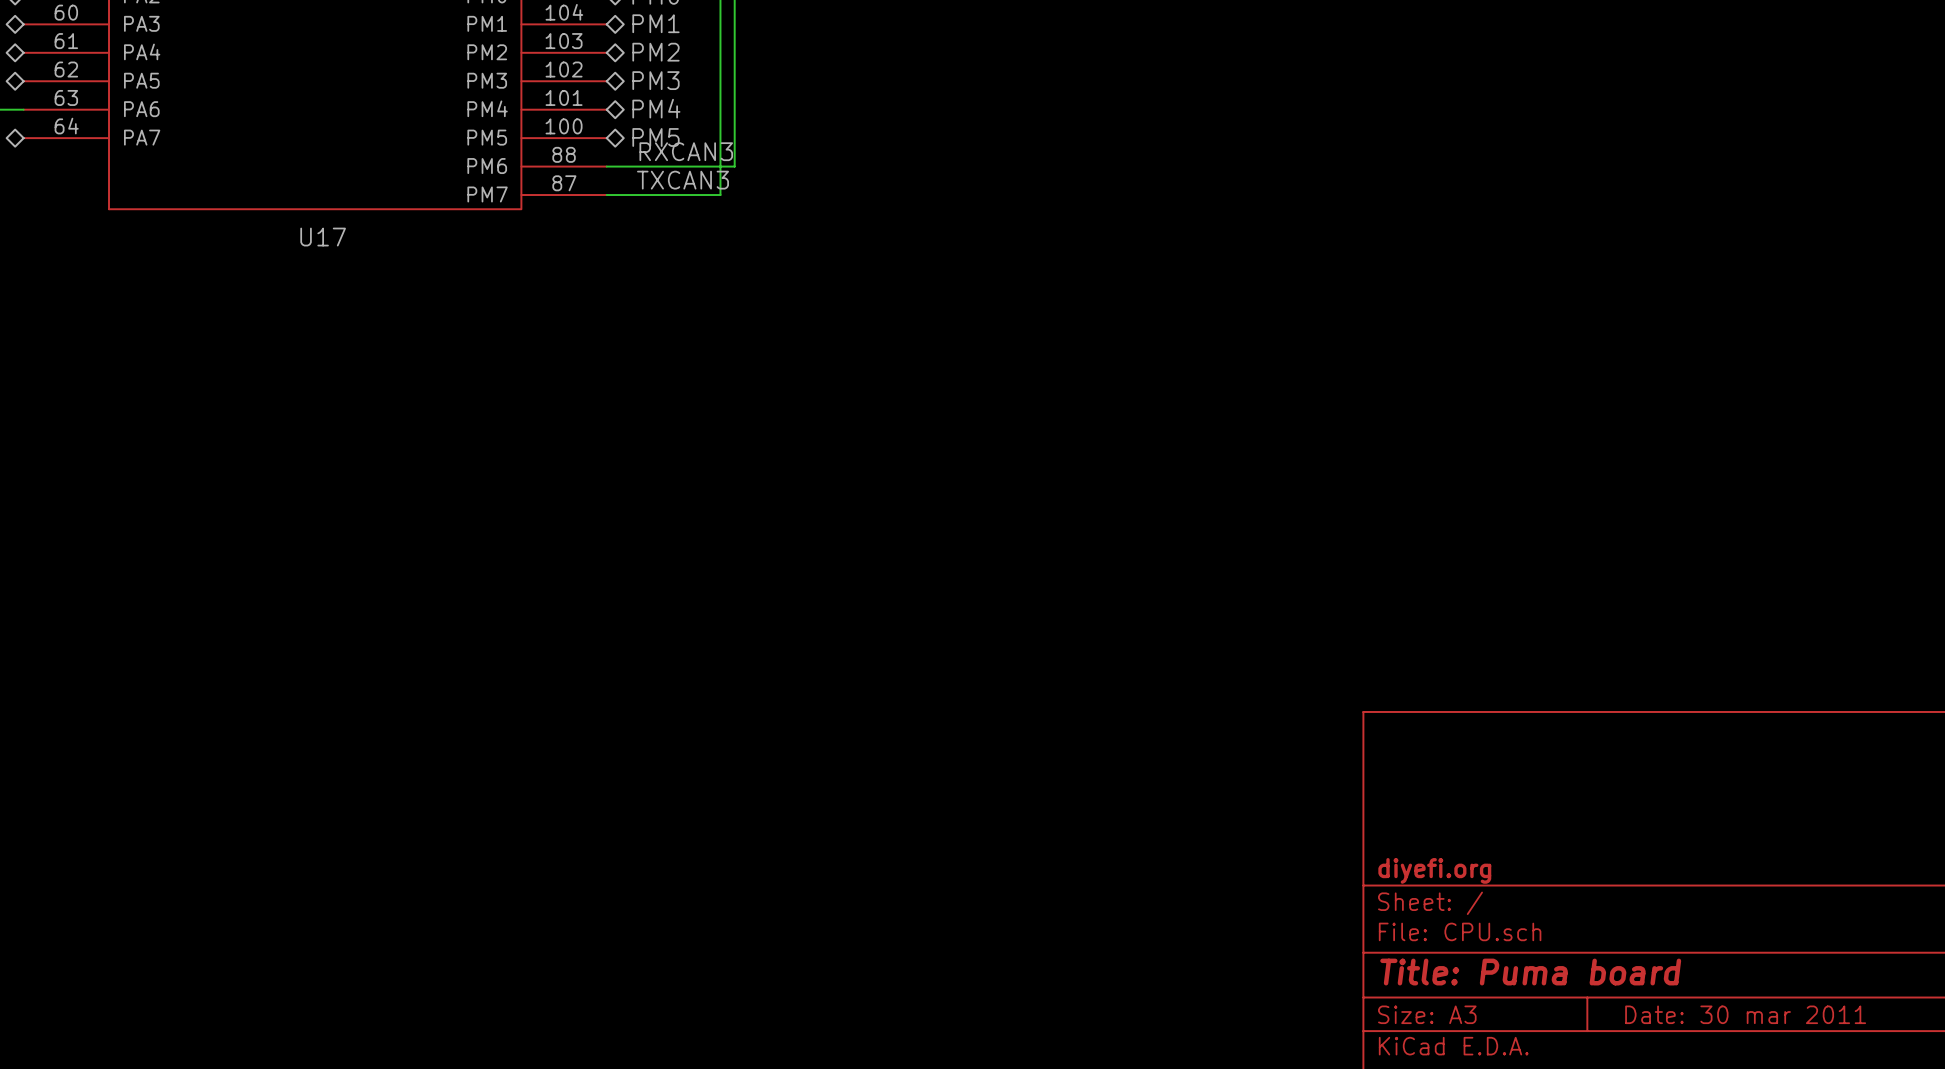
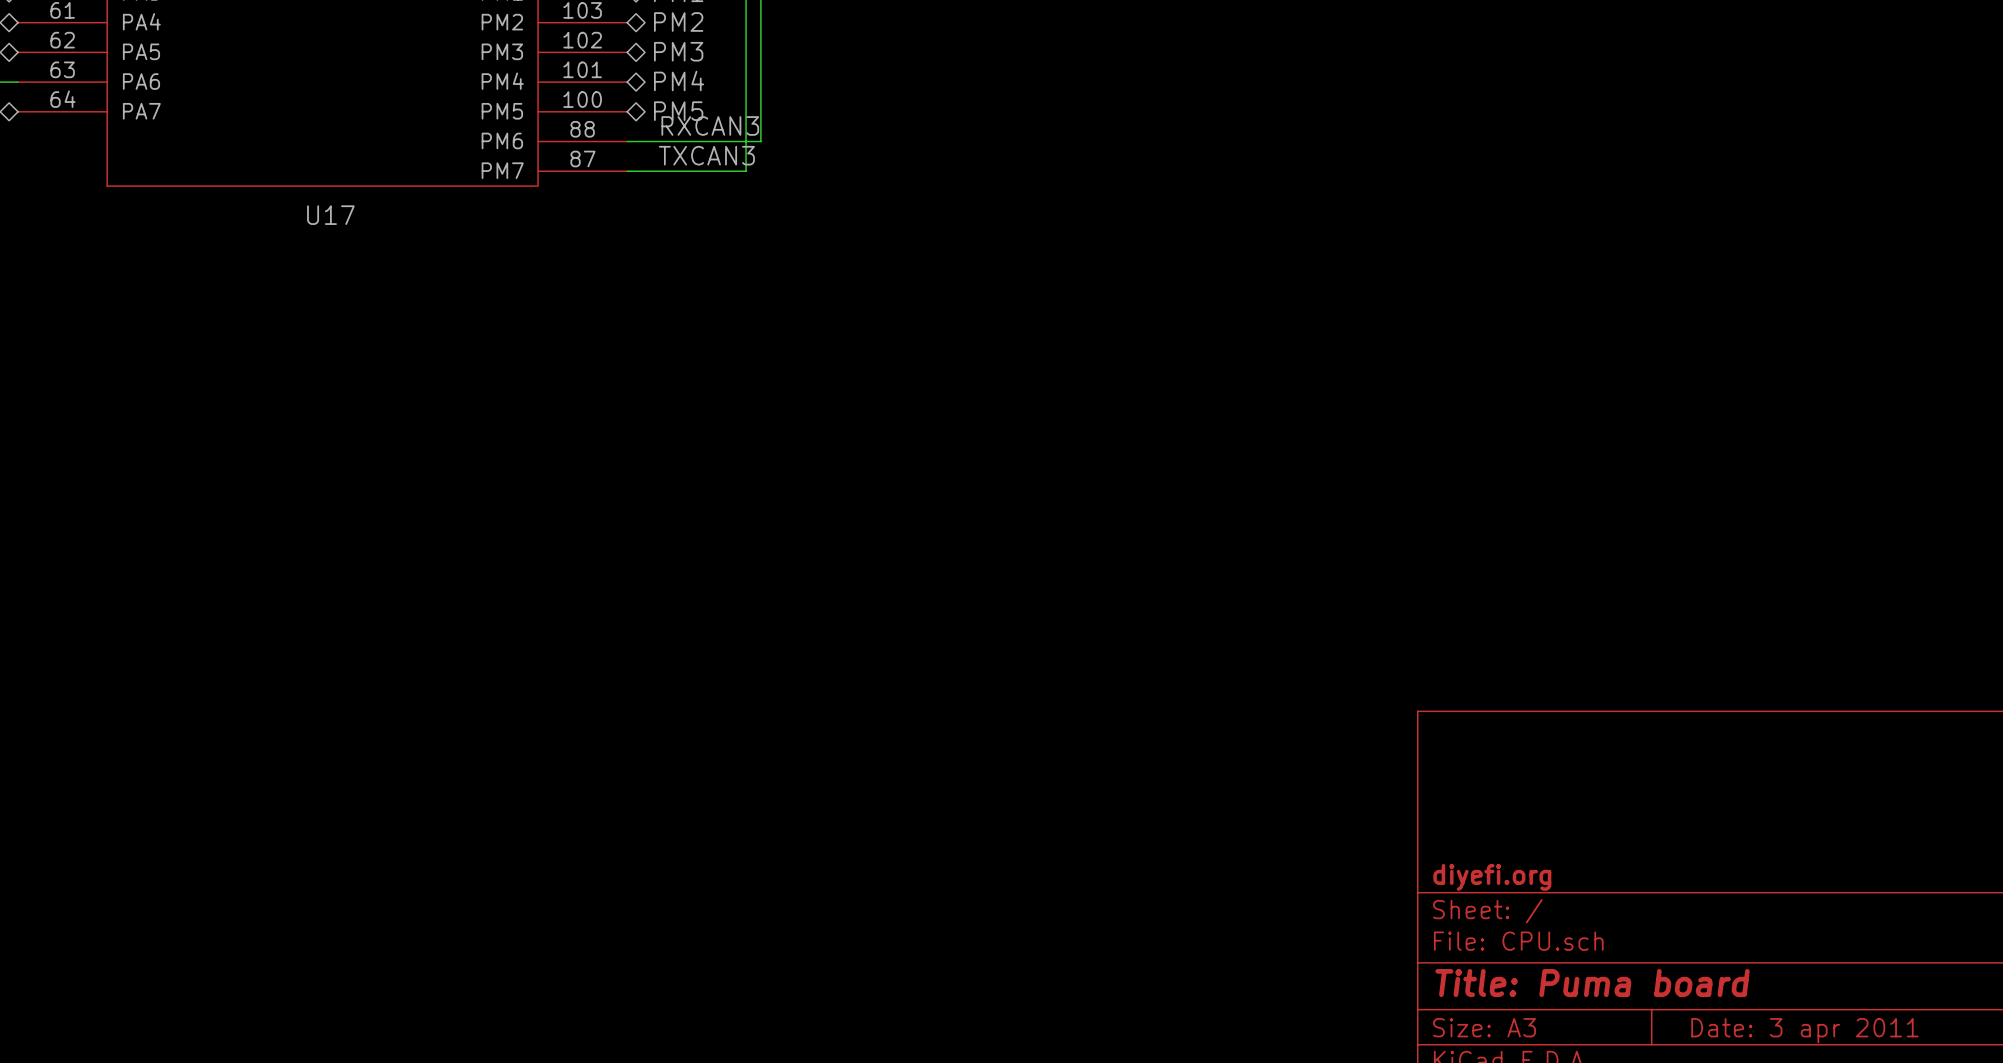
title block: Date: 30 mar 2011 (1745, 1014) -> Date: 3 apr 2011 (1804, 1030)

